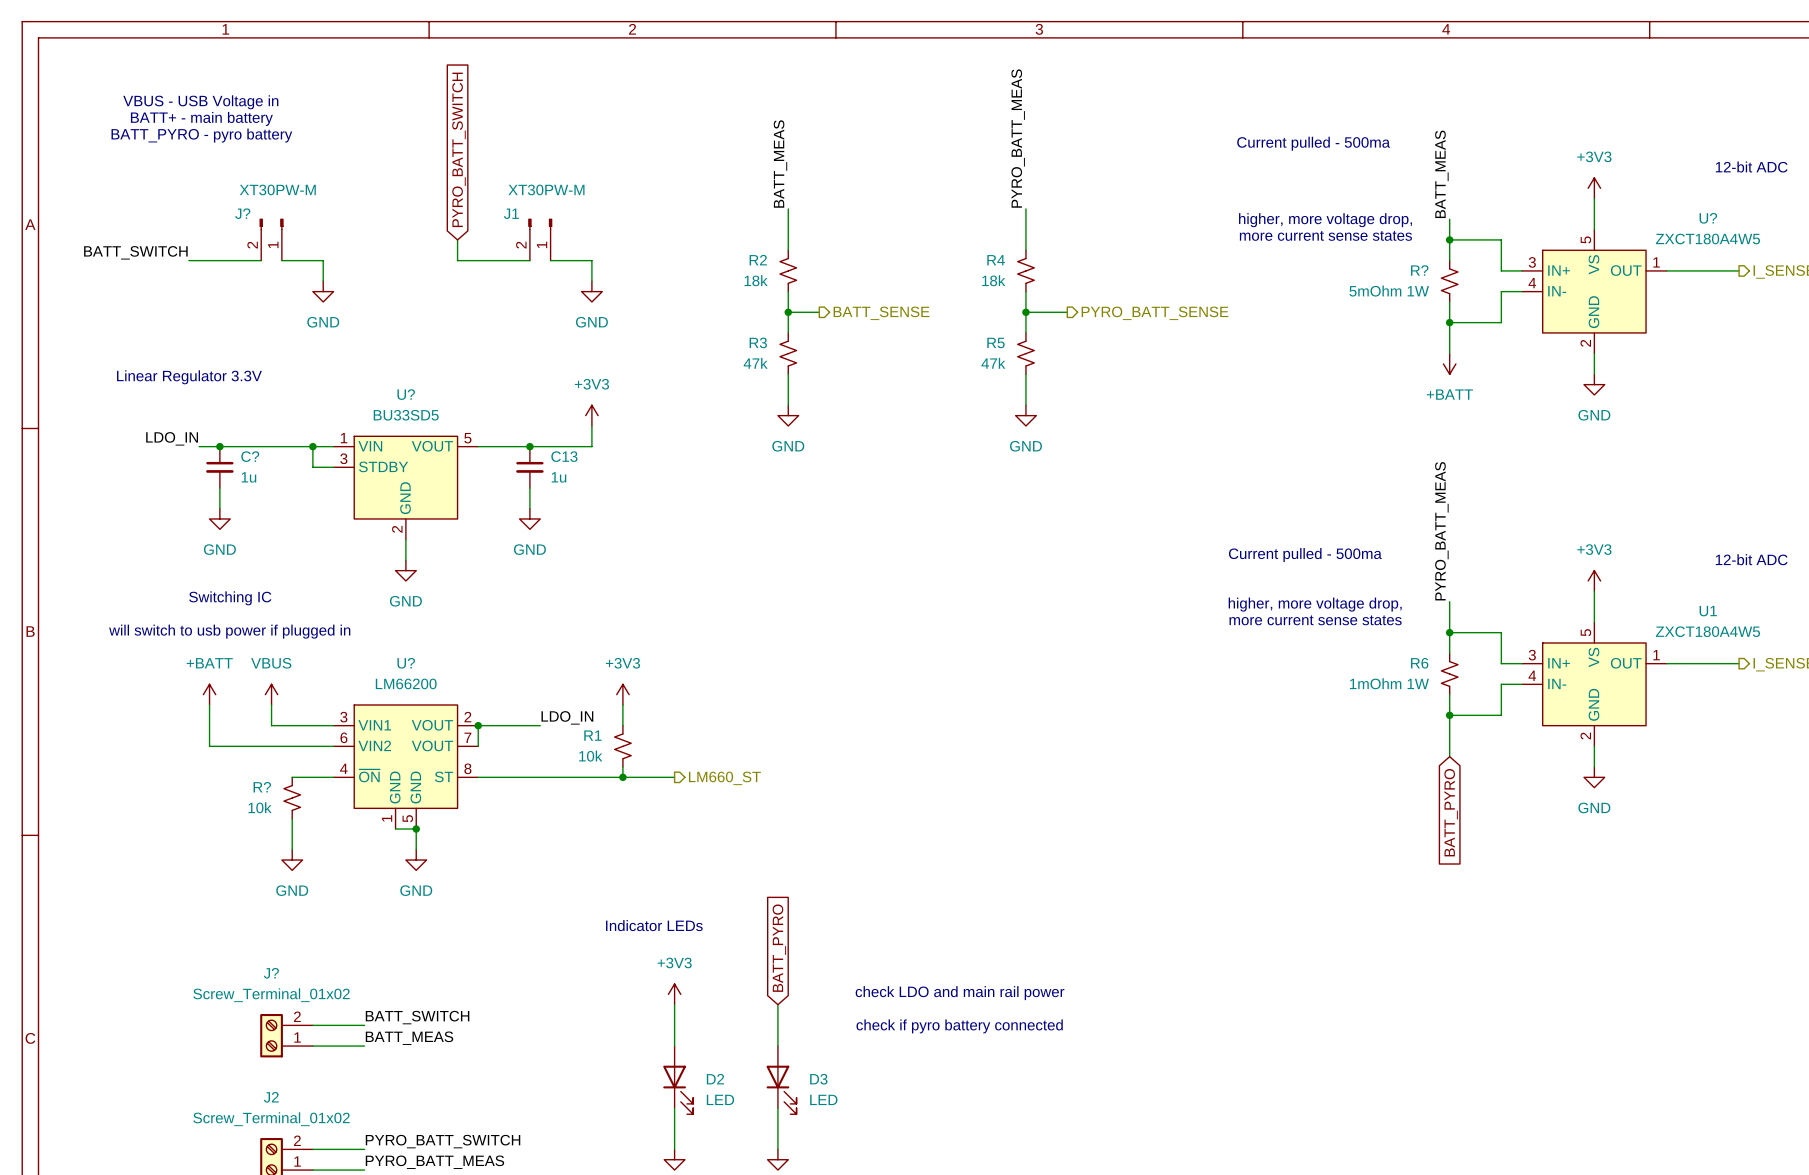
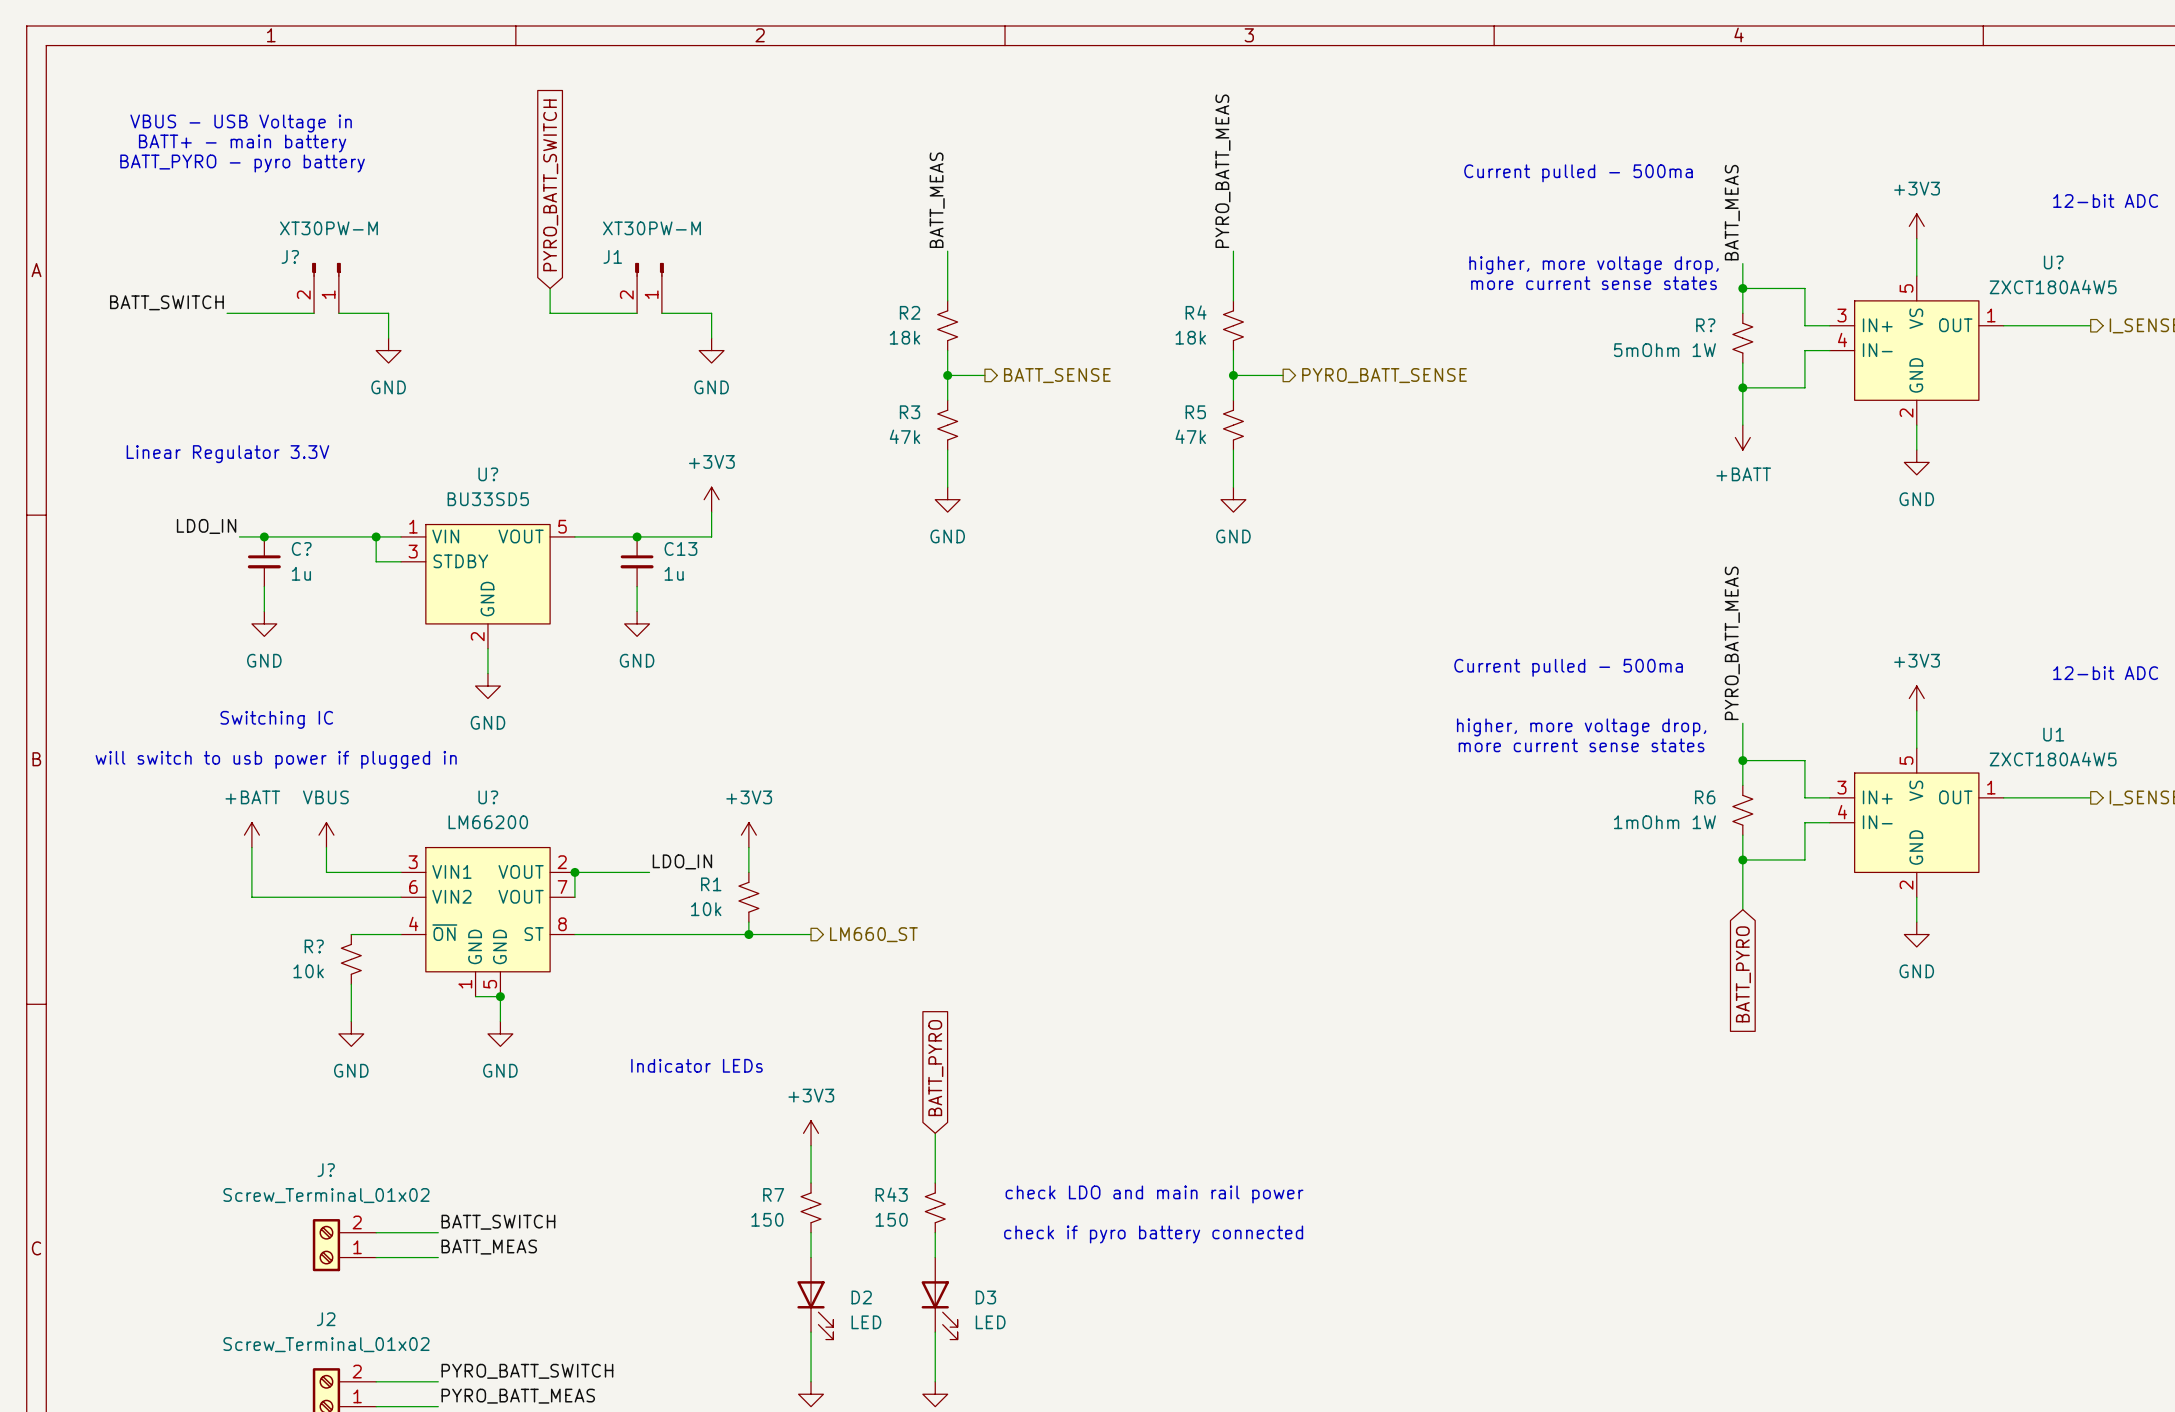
text position: Indicator LEDs (654, 925) -> Indicator LEDs (697, 1065)
wire: none -> (935, 1133) (935, 1183)
global label position: BATT_PYRO (779, 948) -> BATT_PYRO (935, 1068)
wire: none -> (811, 1145) (811, 1183)
power symbol position: +3V3 (674, 994) -> +3V3 (811, 1133)
R7: none -> 150 (811, 1207)
R43: none -> 150 (935, 1207)

